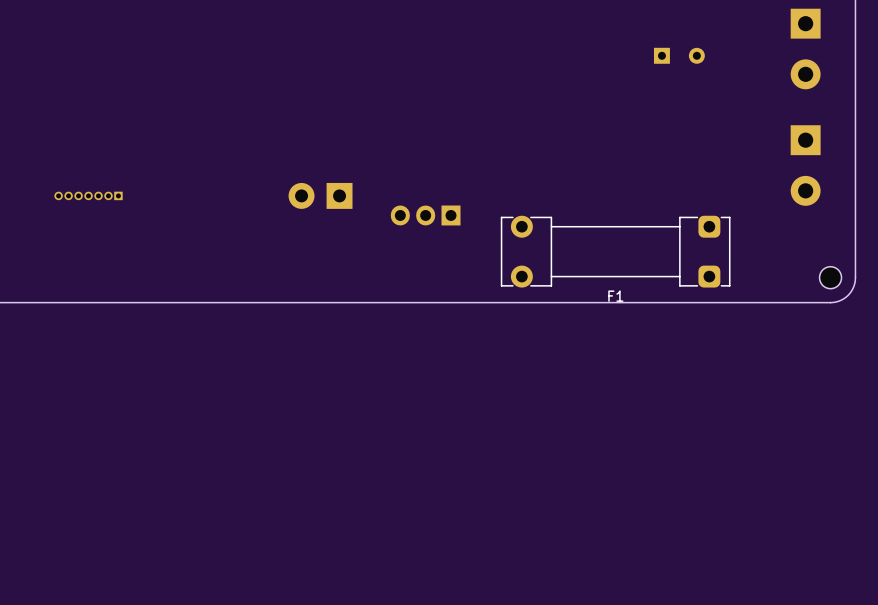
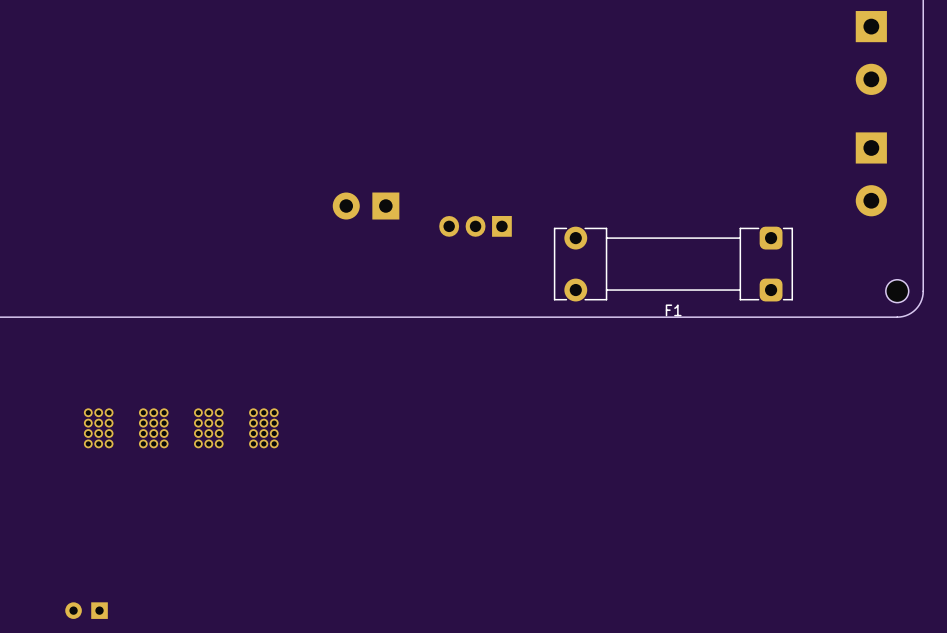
part: (679, 55) -> none
part: (88, 195) -> none
part: none -> (98, 428)
part: none -> (153, 428)
part: none -> (208, 428)
part: none -> (263, 428)
part: none -> (86, 610)

